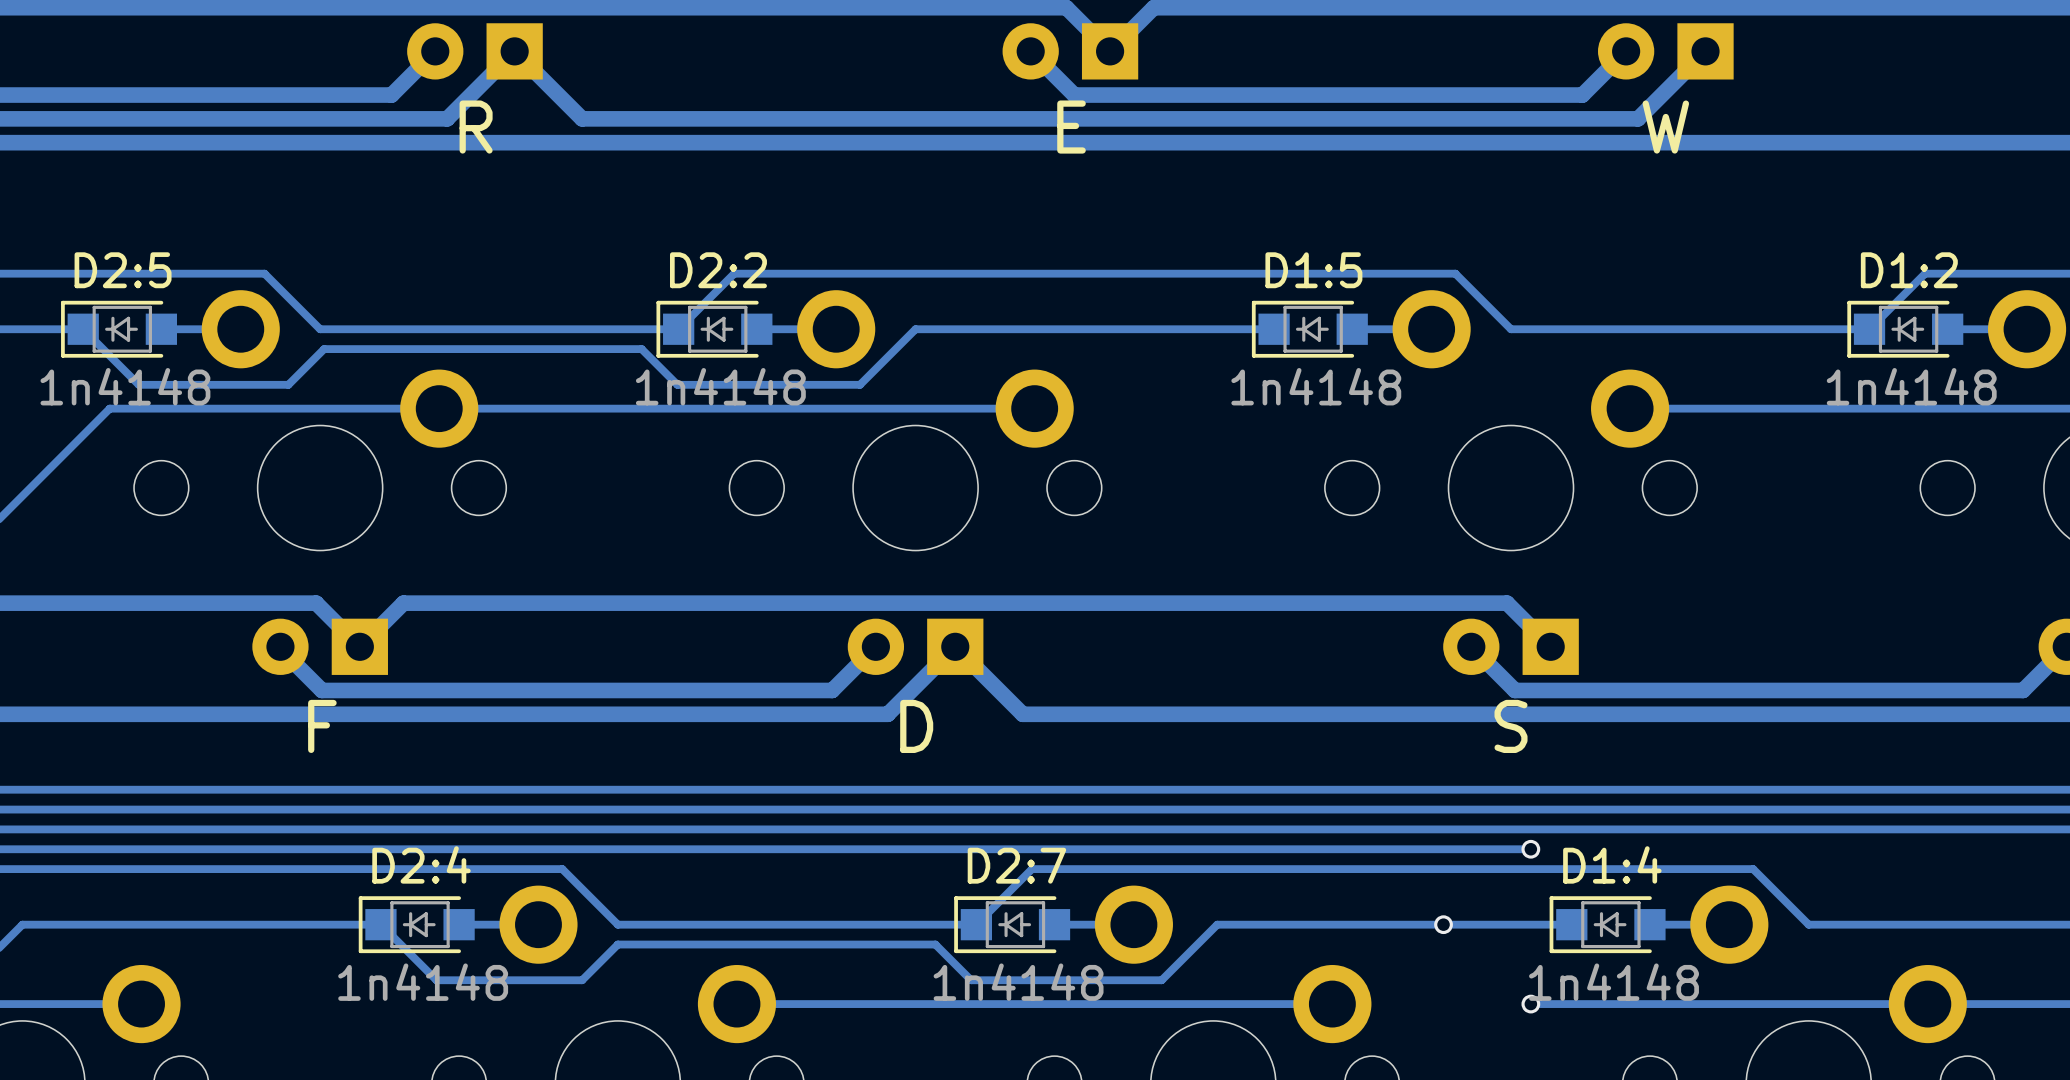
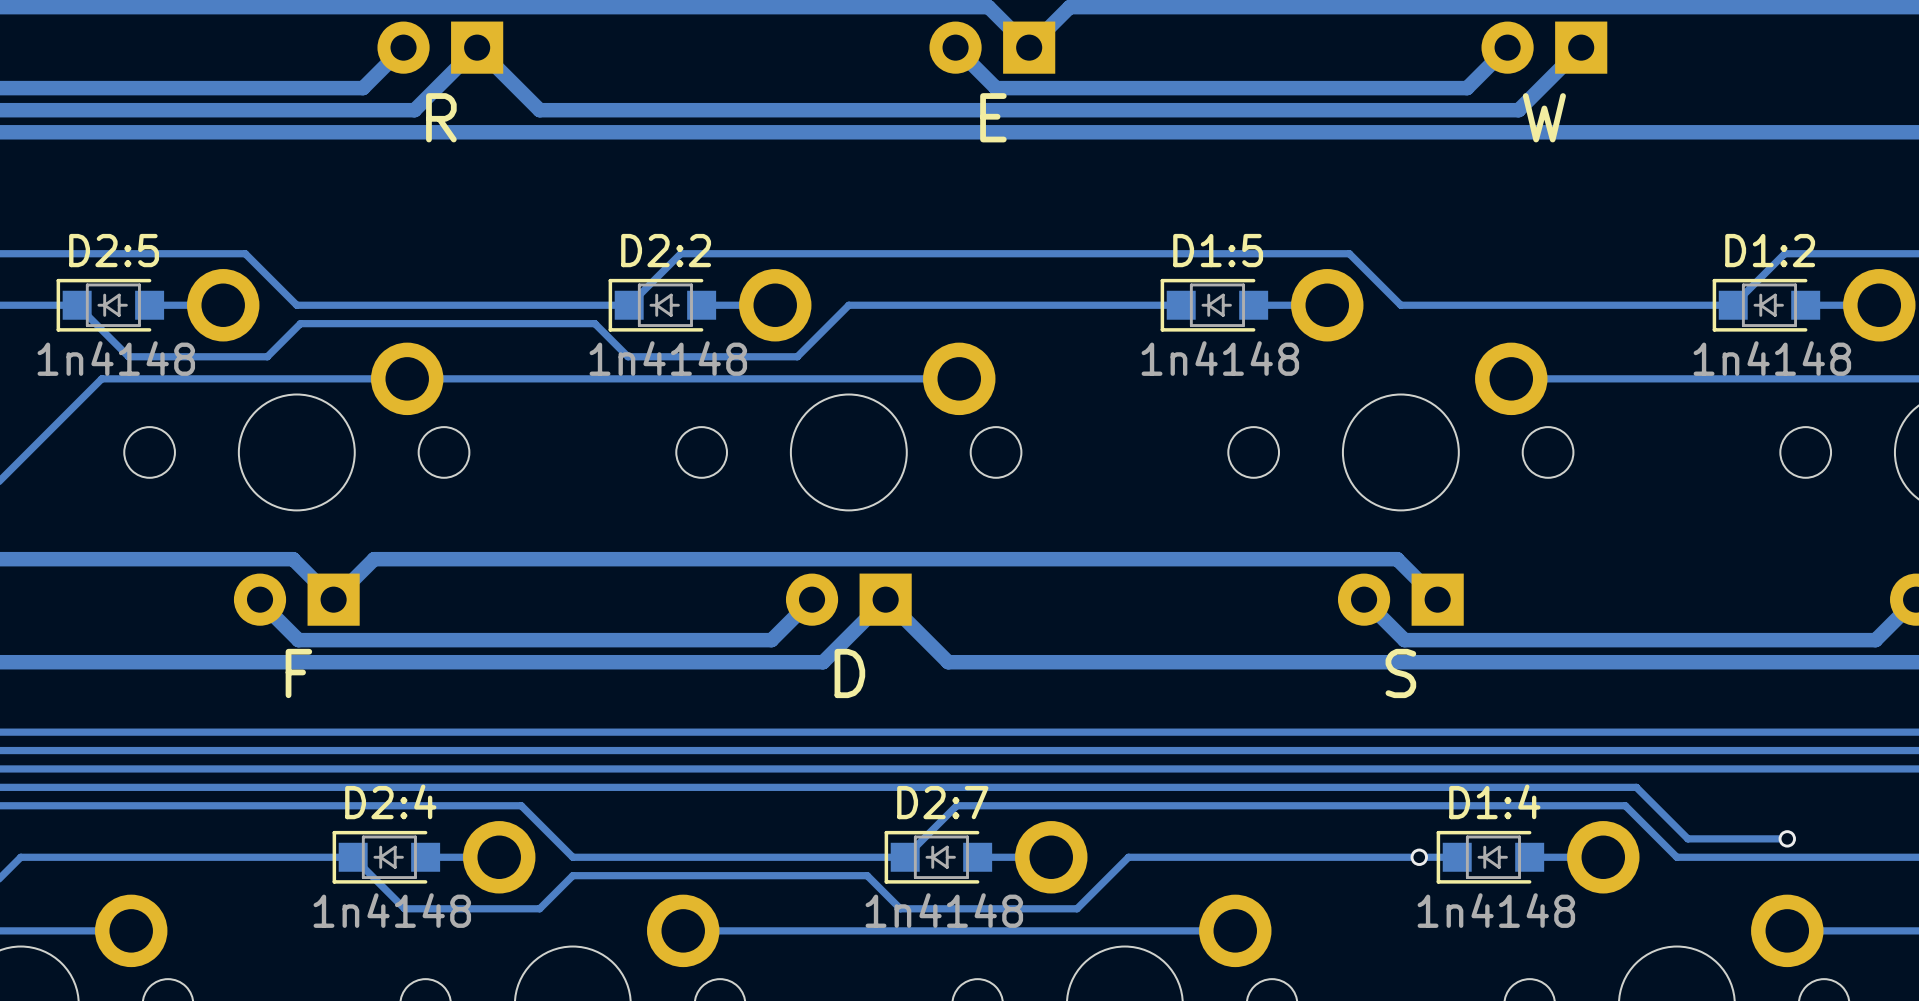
track: none -> (1419, 787) (1636, 787) (1687, 838) (1787, 838)
via: (1530, 849) -> none
via: none -> (1787, 838)
via: (1443, 924) -> none
via: none -> (1419, 857)
via: (1530, 1004) -> none
track: (1927, 1004) (1530, 1004) -> none

